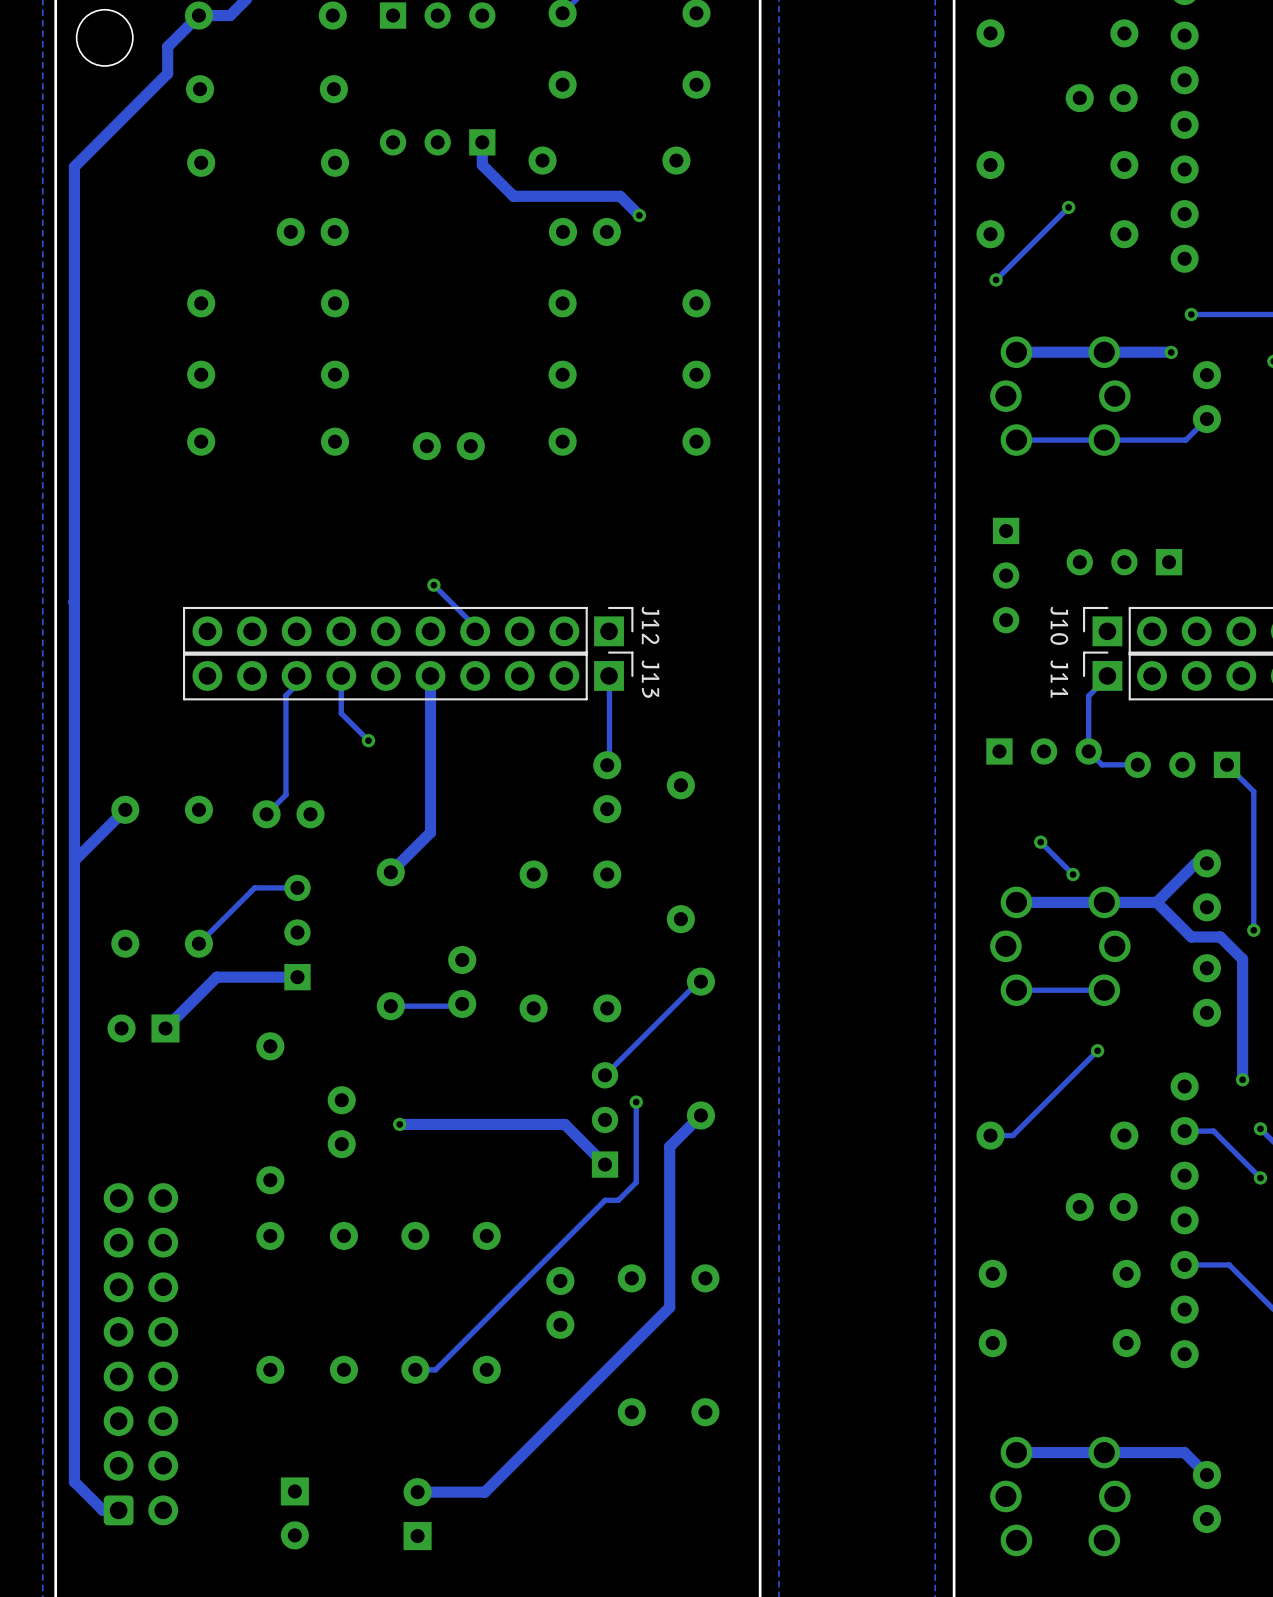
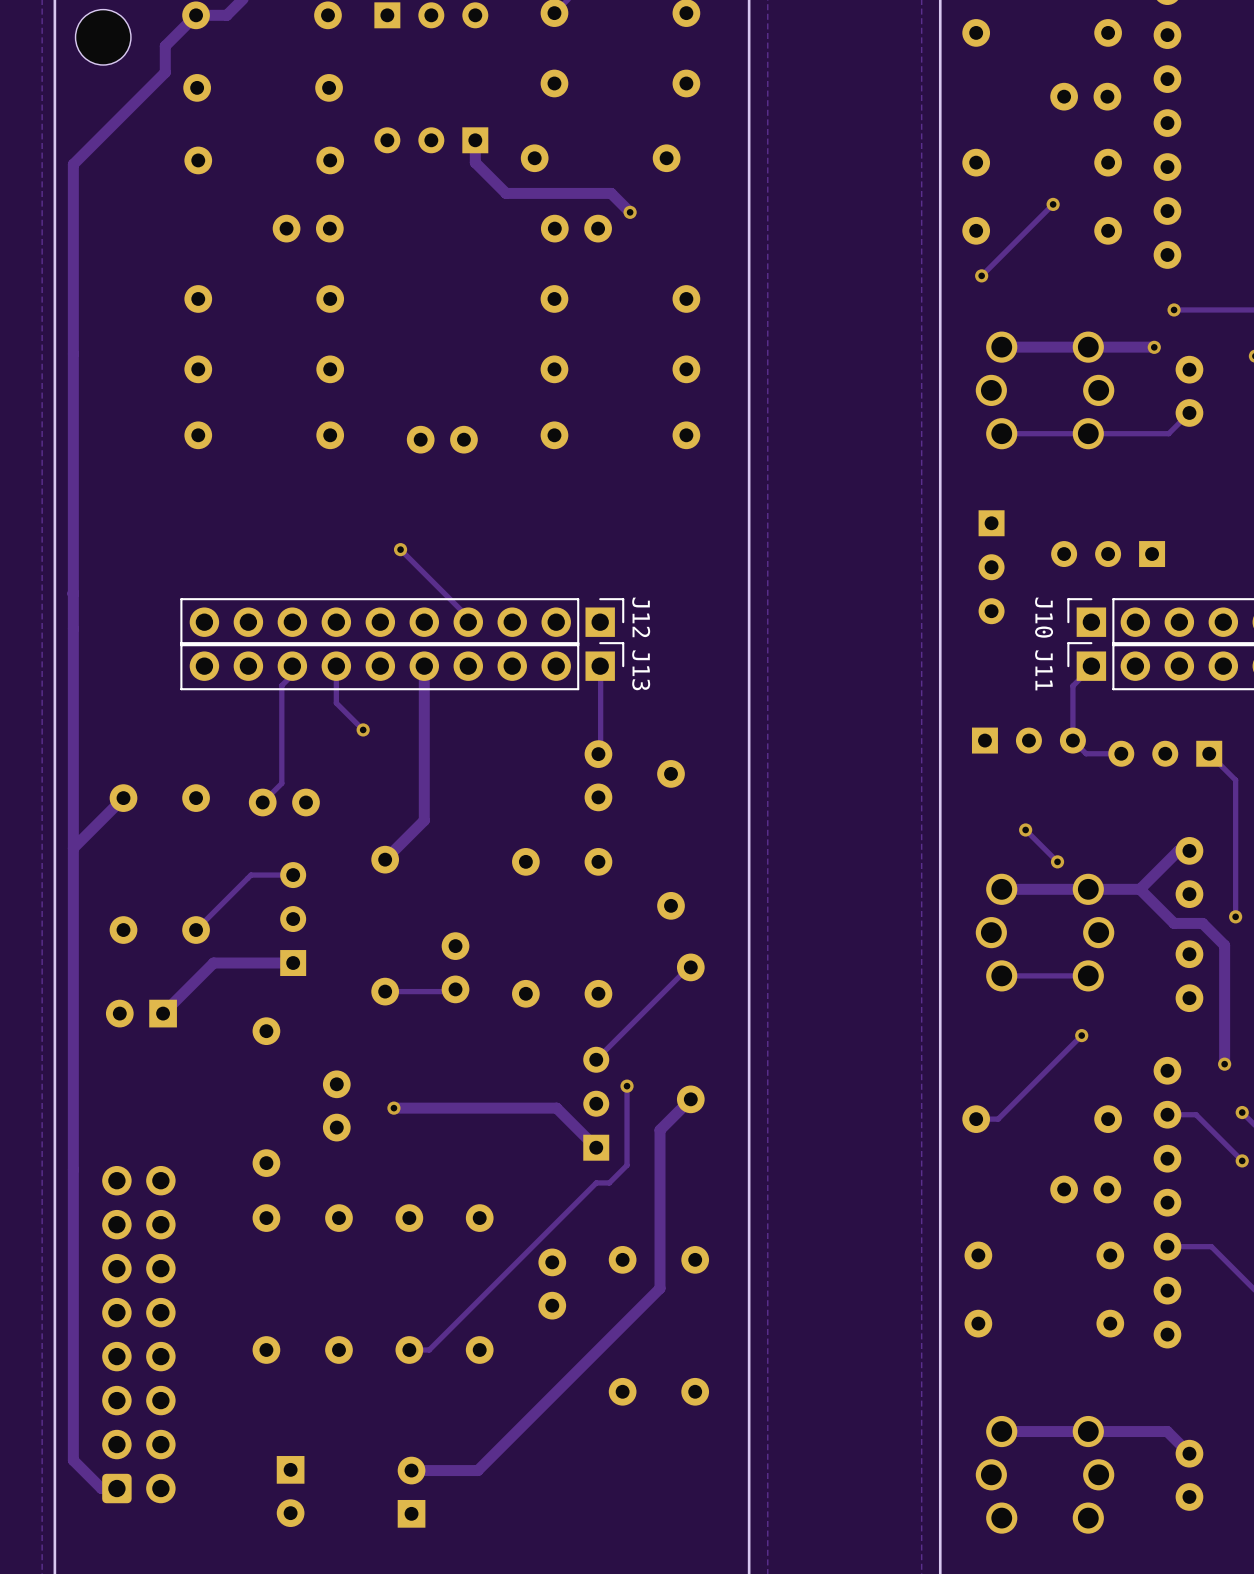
track: none -> (400, 549) (427, 576)
via position: (433, 585) -> (400, 549)

